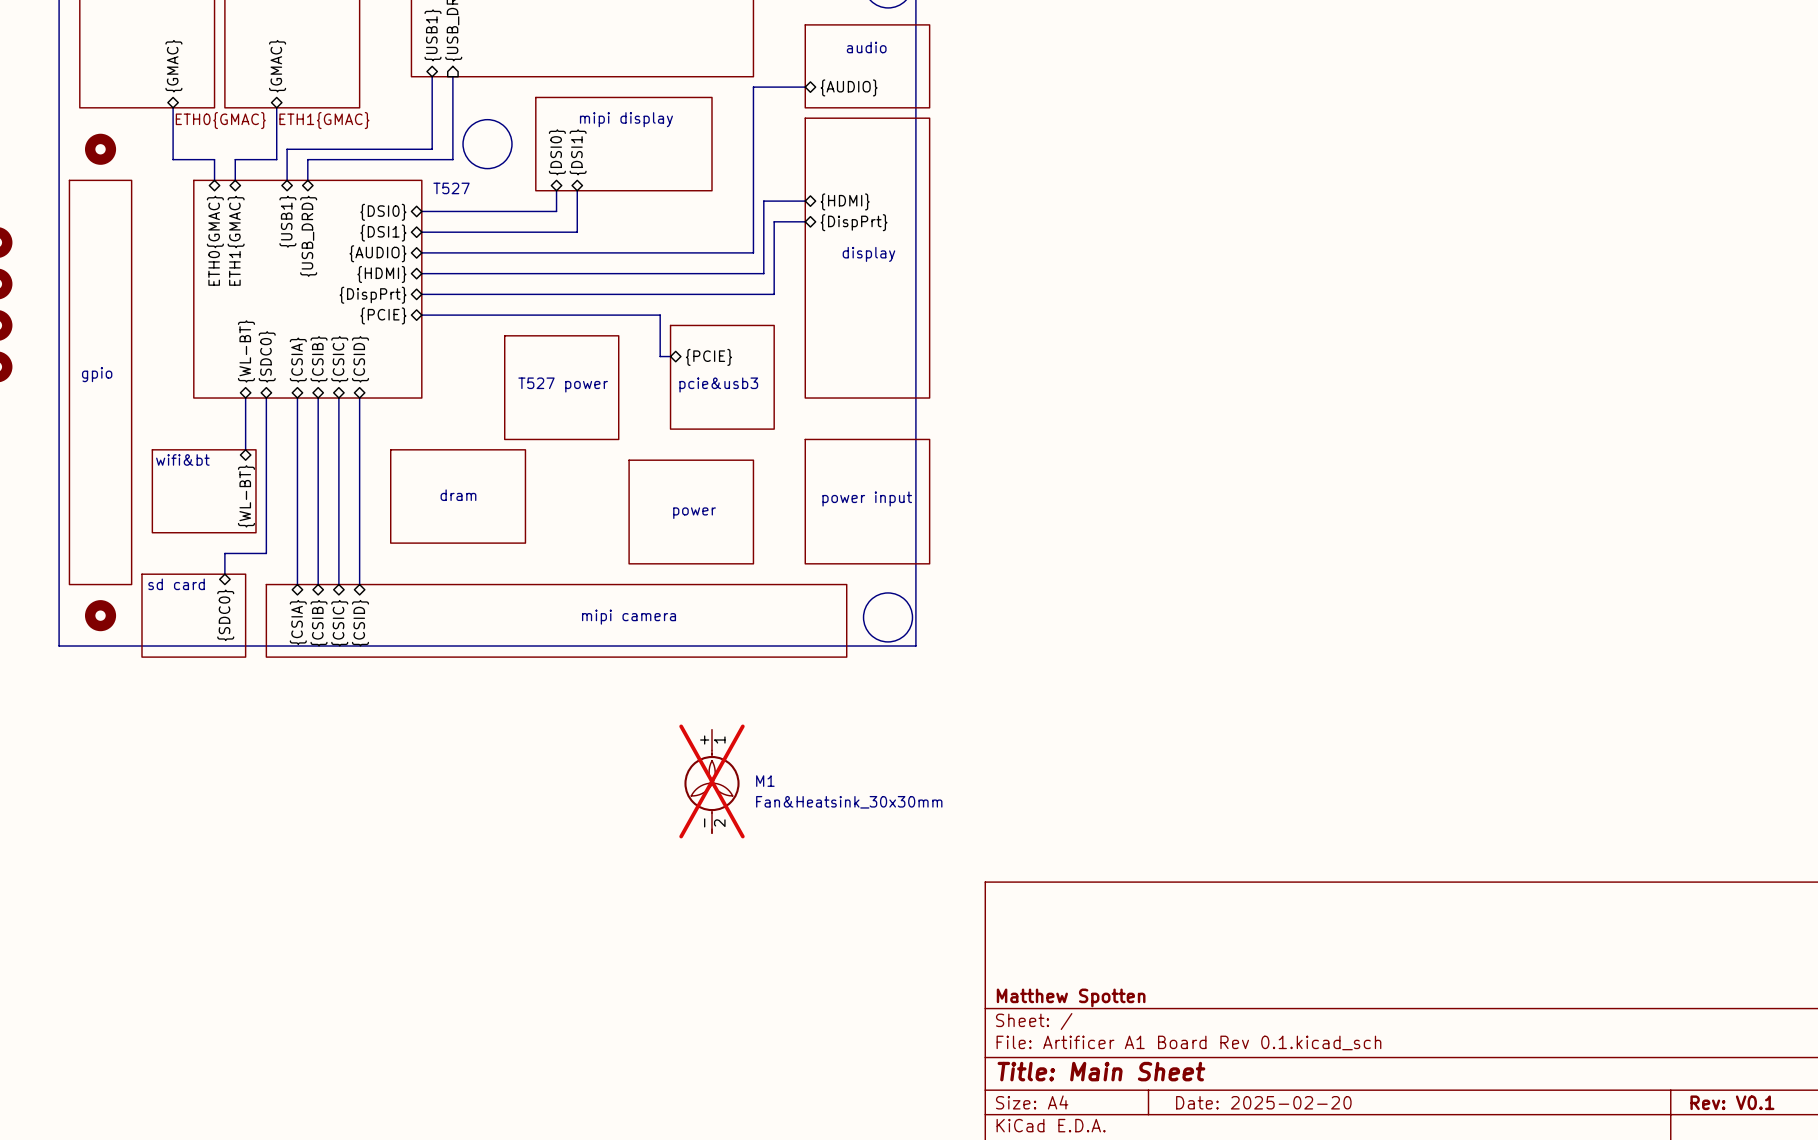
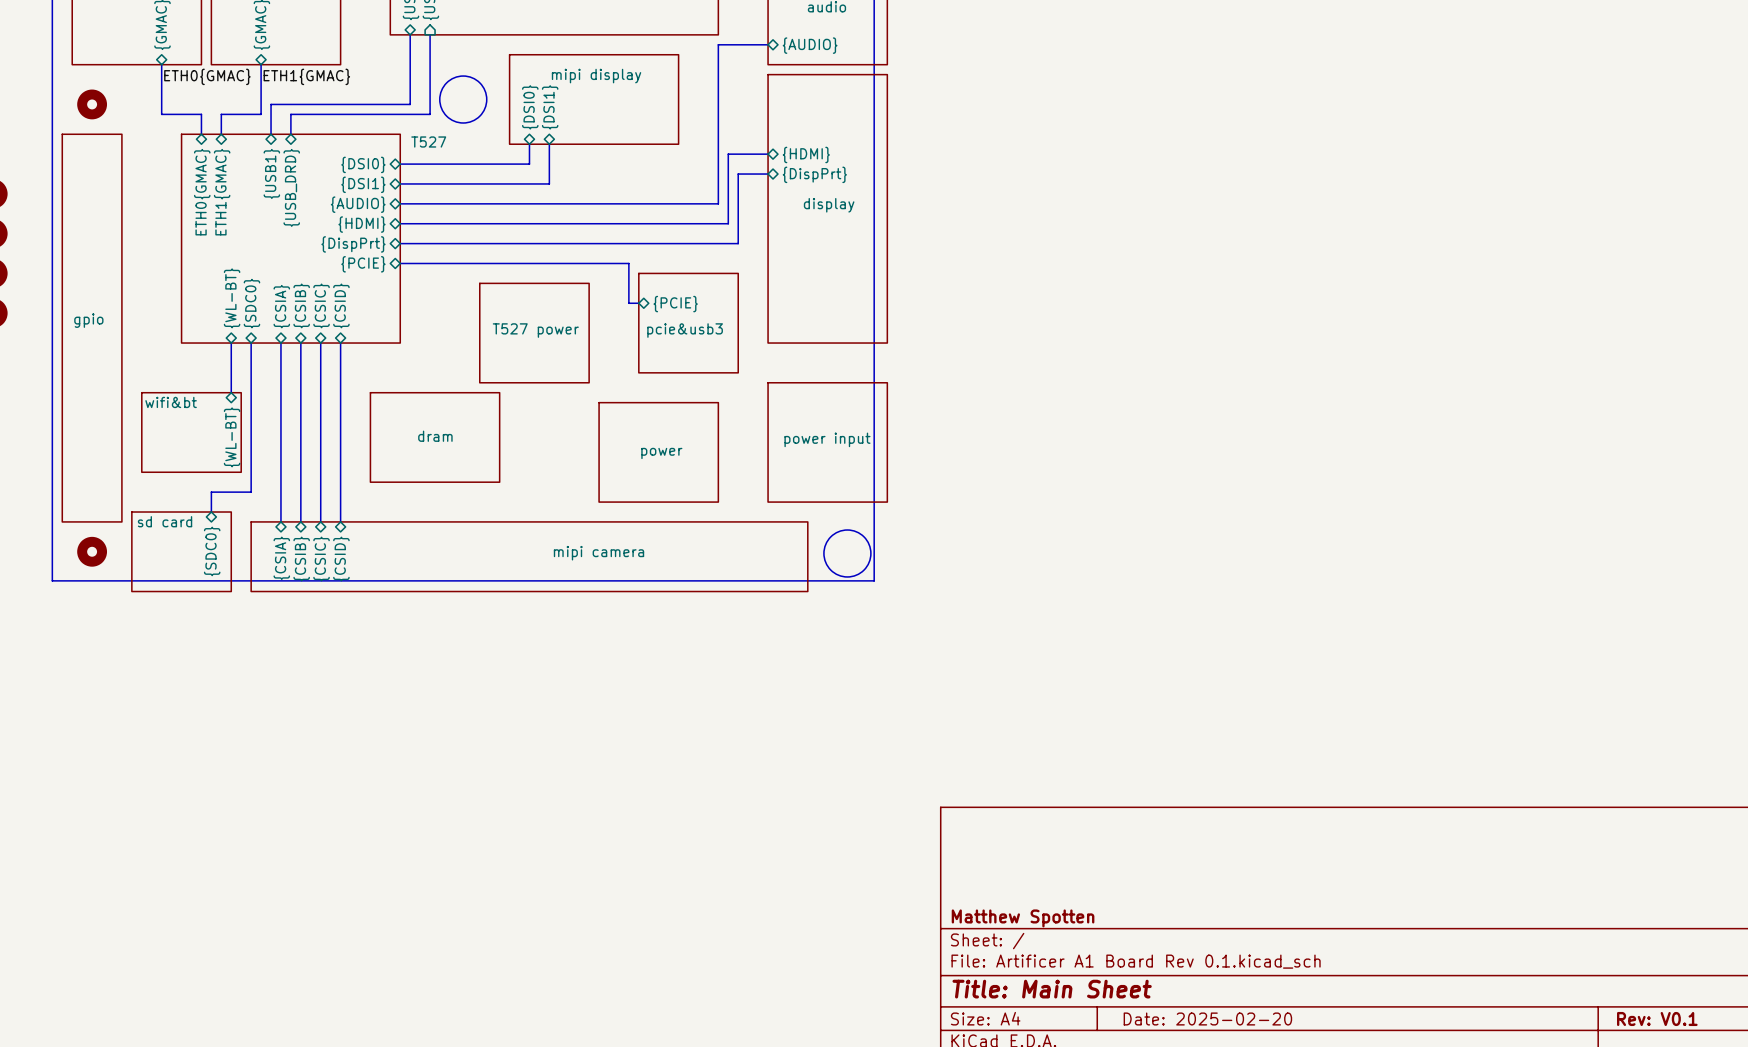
M1: Fan&Heatsink_30x30mm (711, 781) -> none

